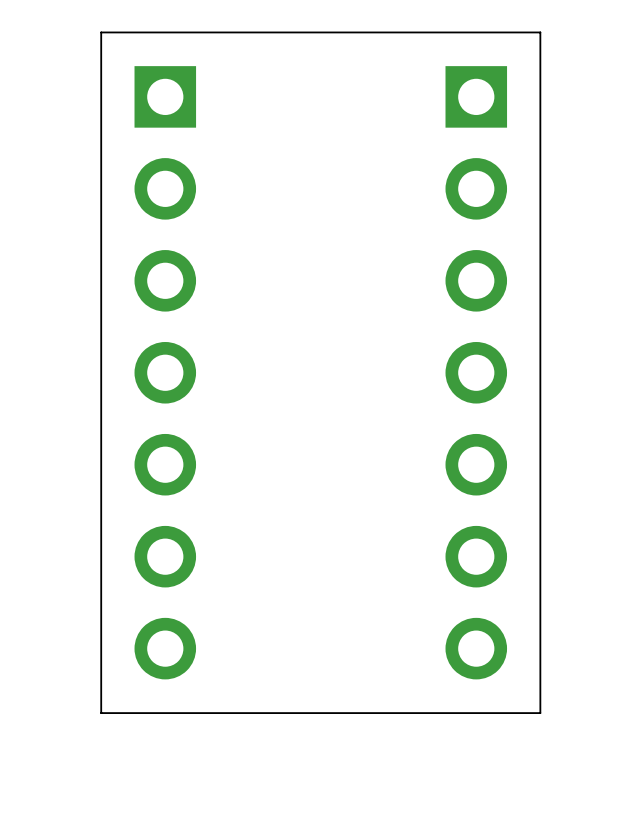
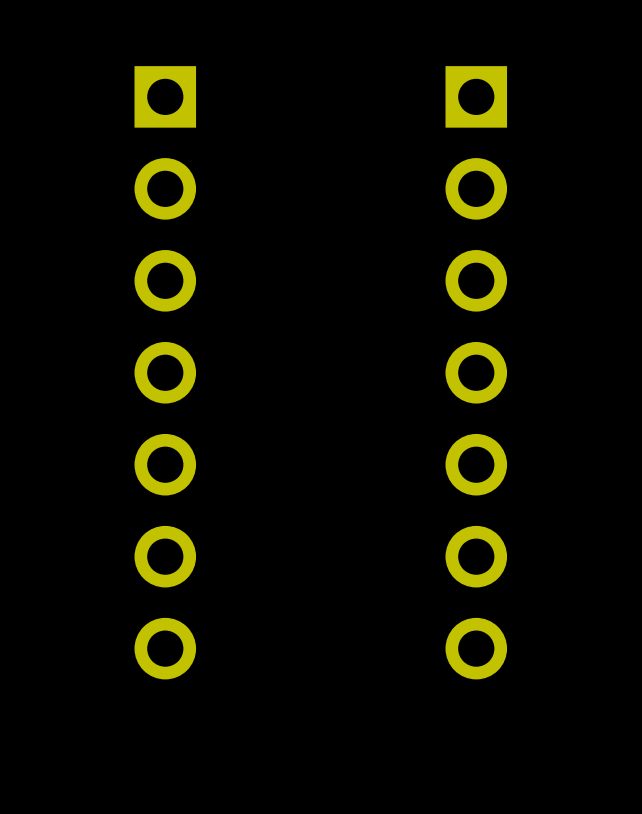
board edge: (540, 32) (540, 713) (101, 713) (101, 32) (540, 32) -> none

